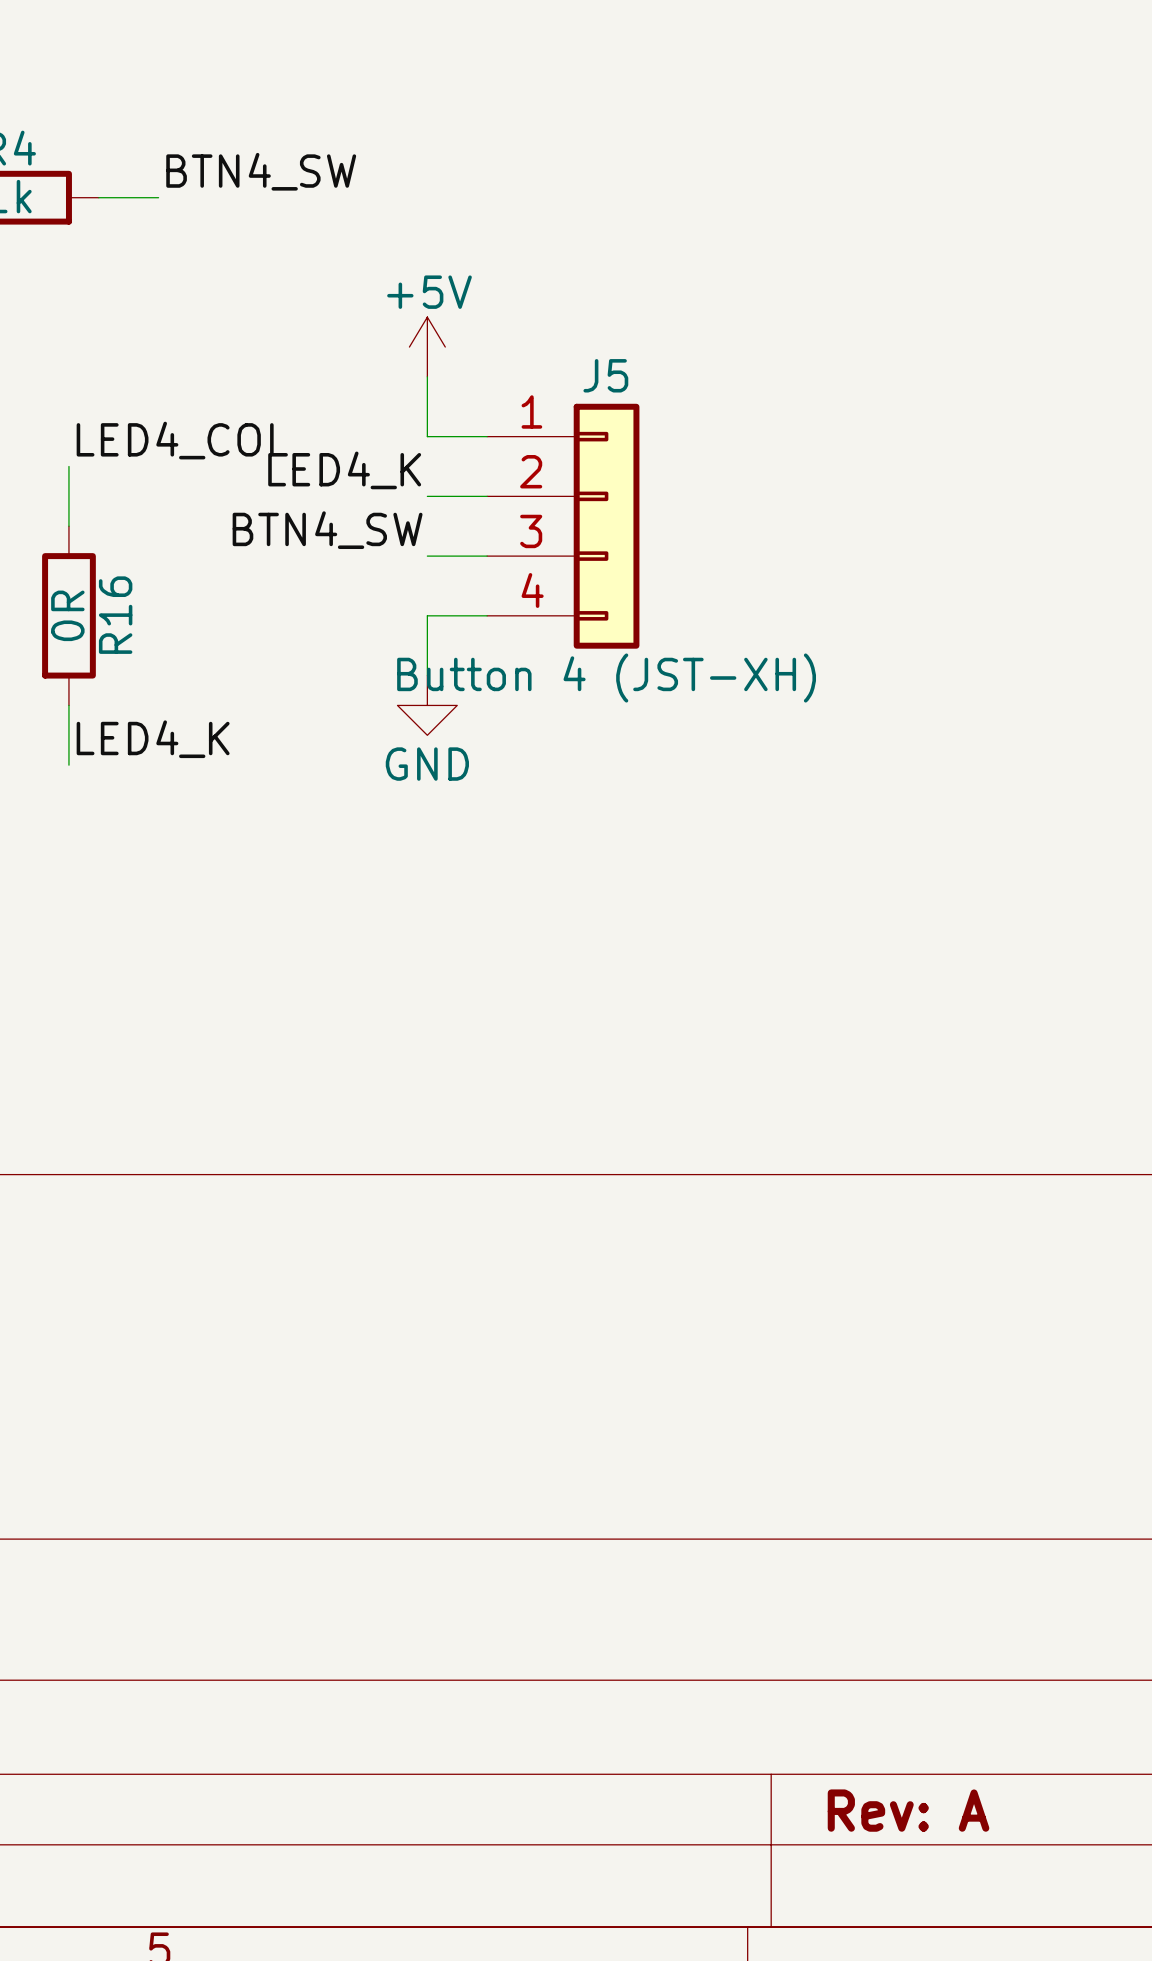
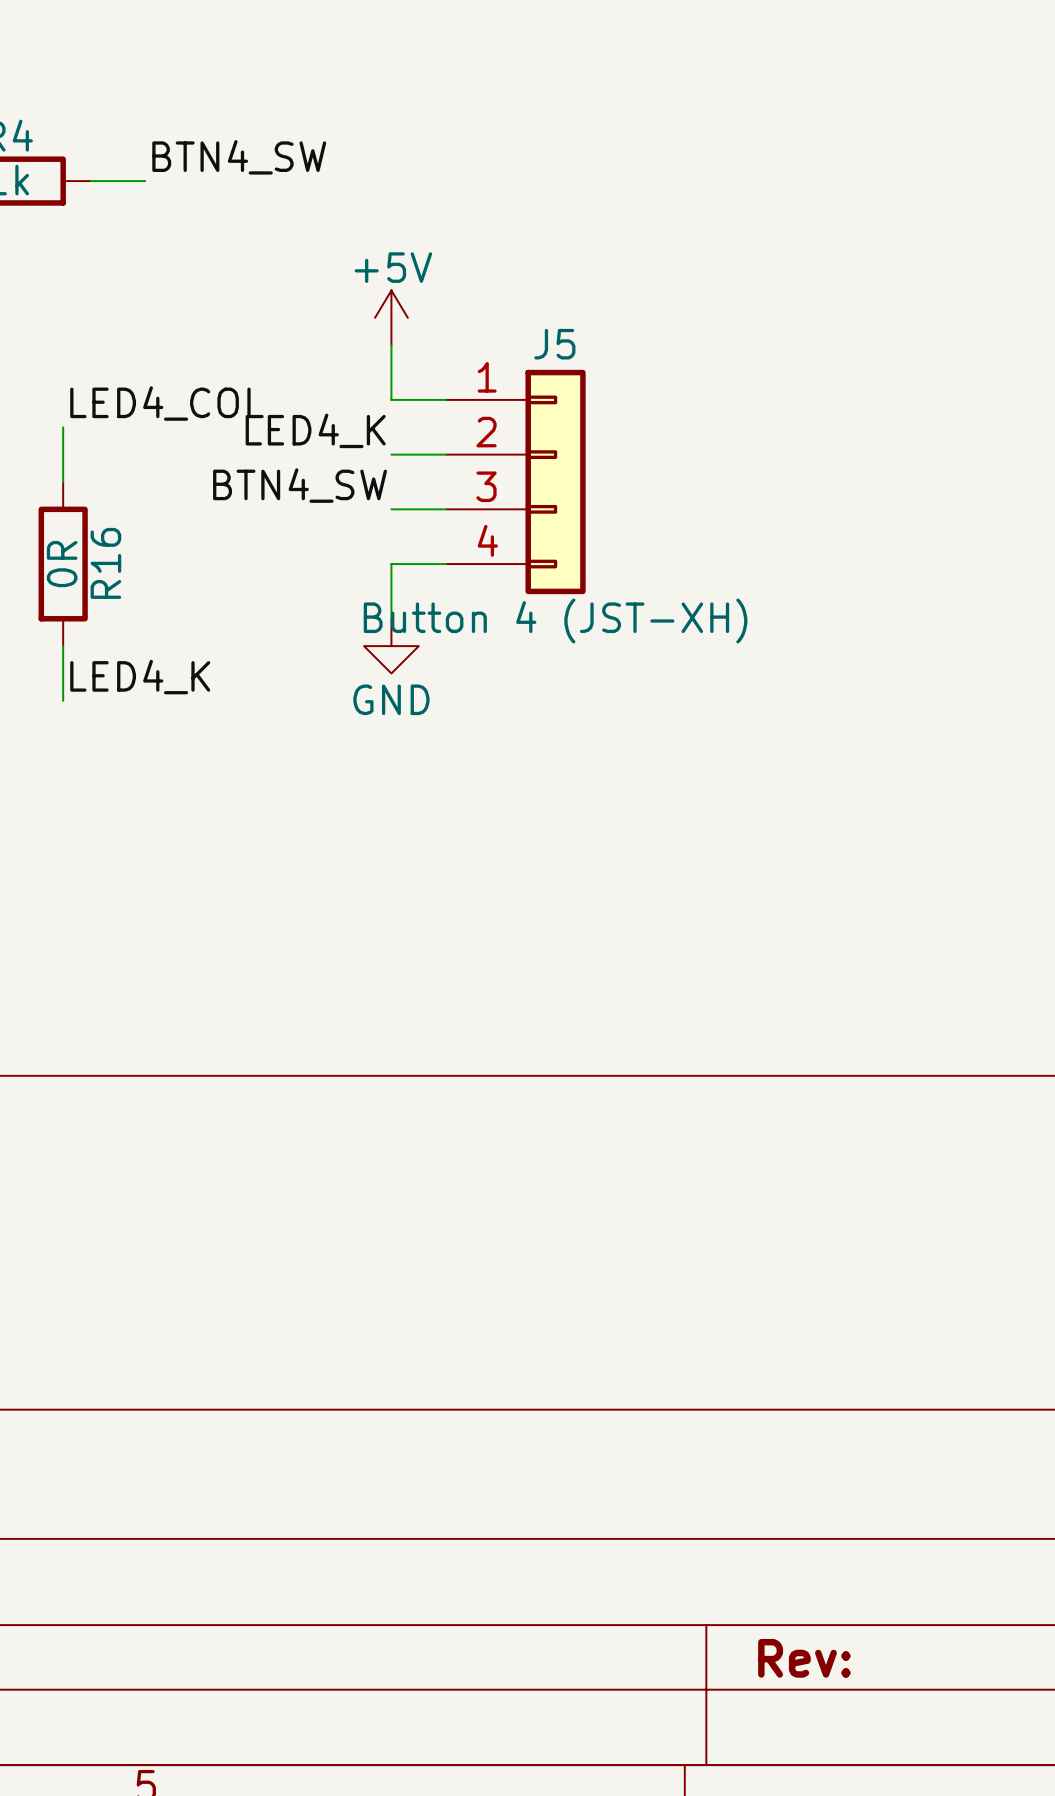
title block: Rev: A (908, 1810) -> Rev: (804, 1658)

